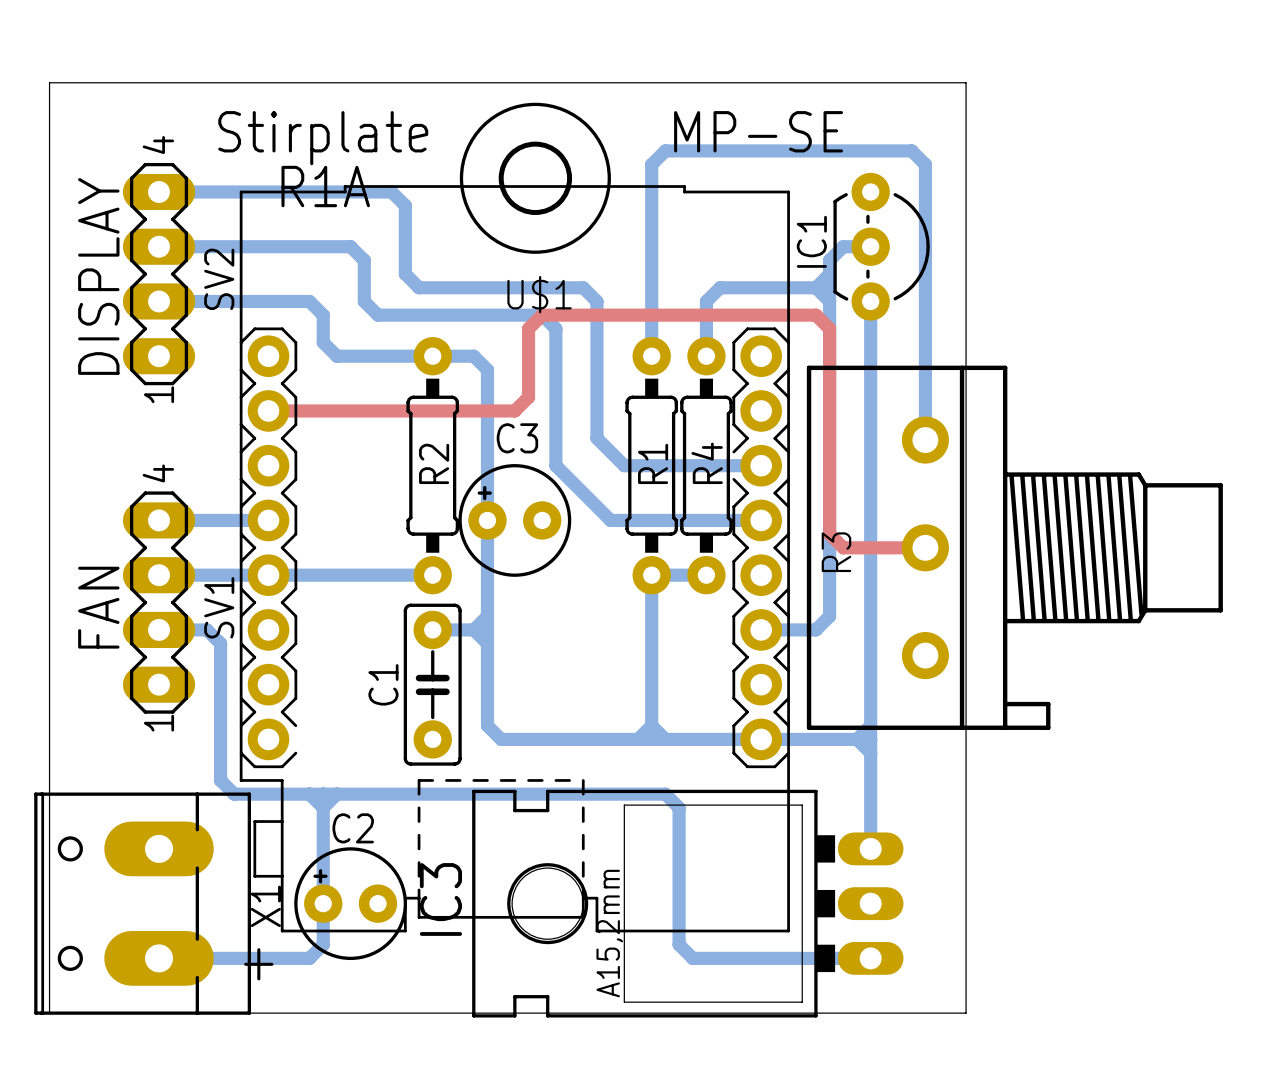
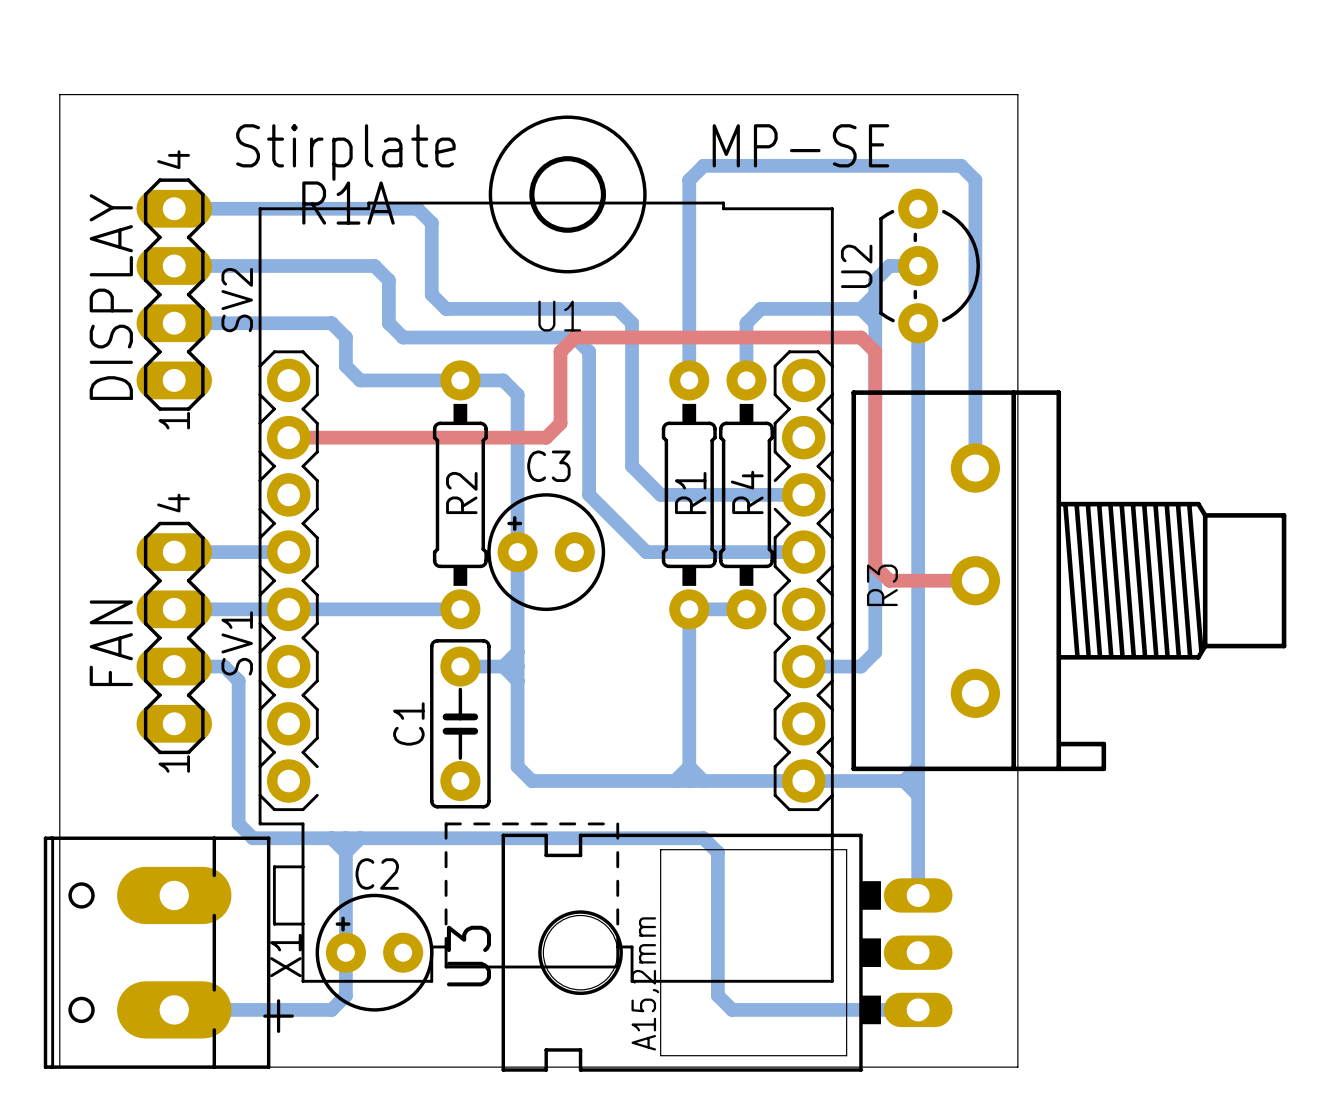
IC1 name: IC1 (811, 241) -> U2 (856, 266)
U$1 name: U$1 (539, 294) -> U1 (559, 316)
IC3 name: IC3 (440, 899) -> U3 (468, 956)

